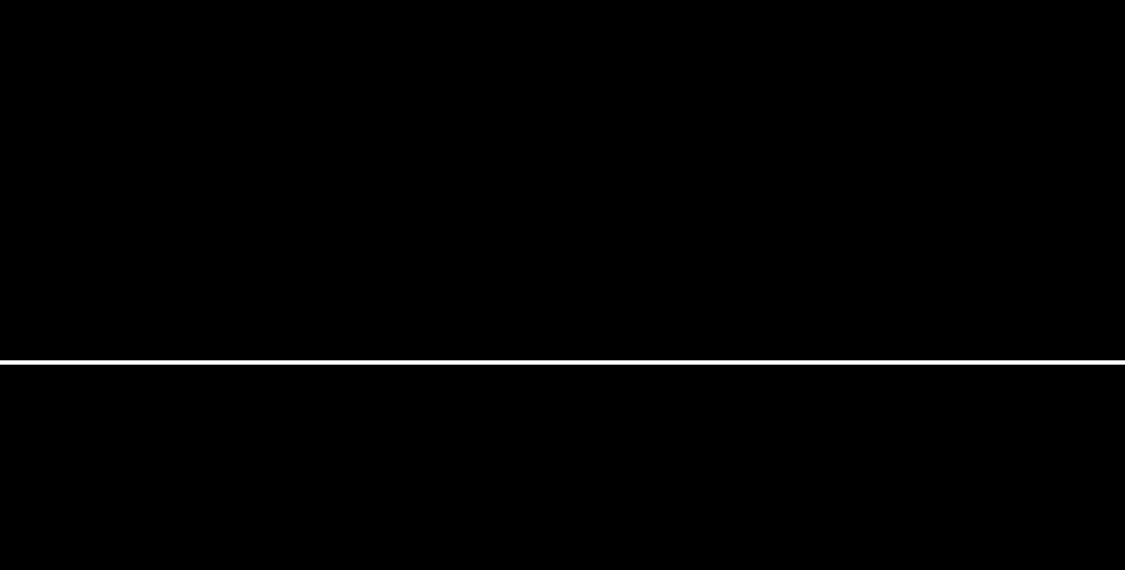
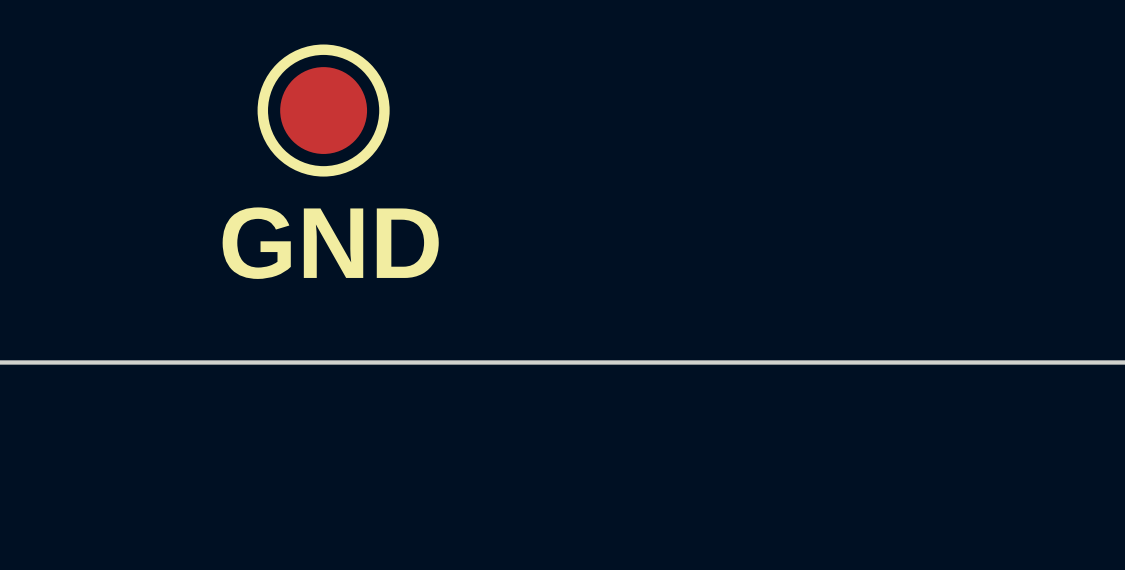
part: none -> (323, 110)
text: none -> GND (330, 243)

